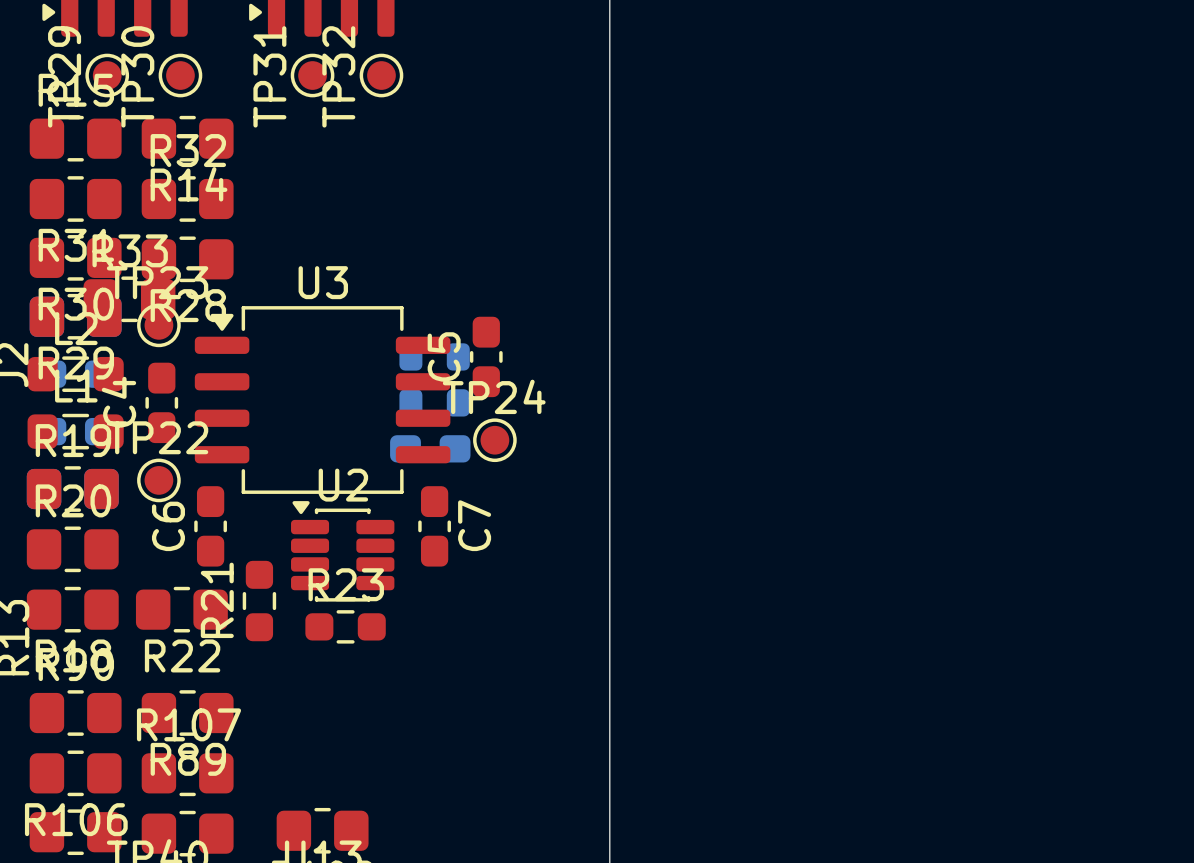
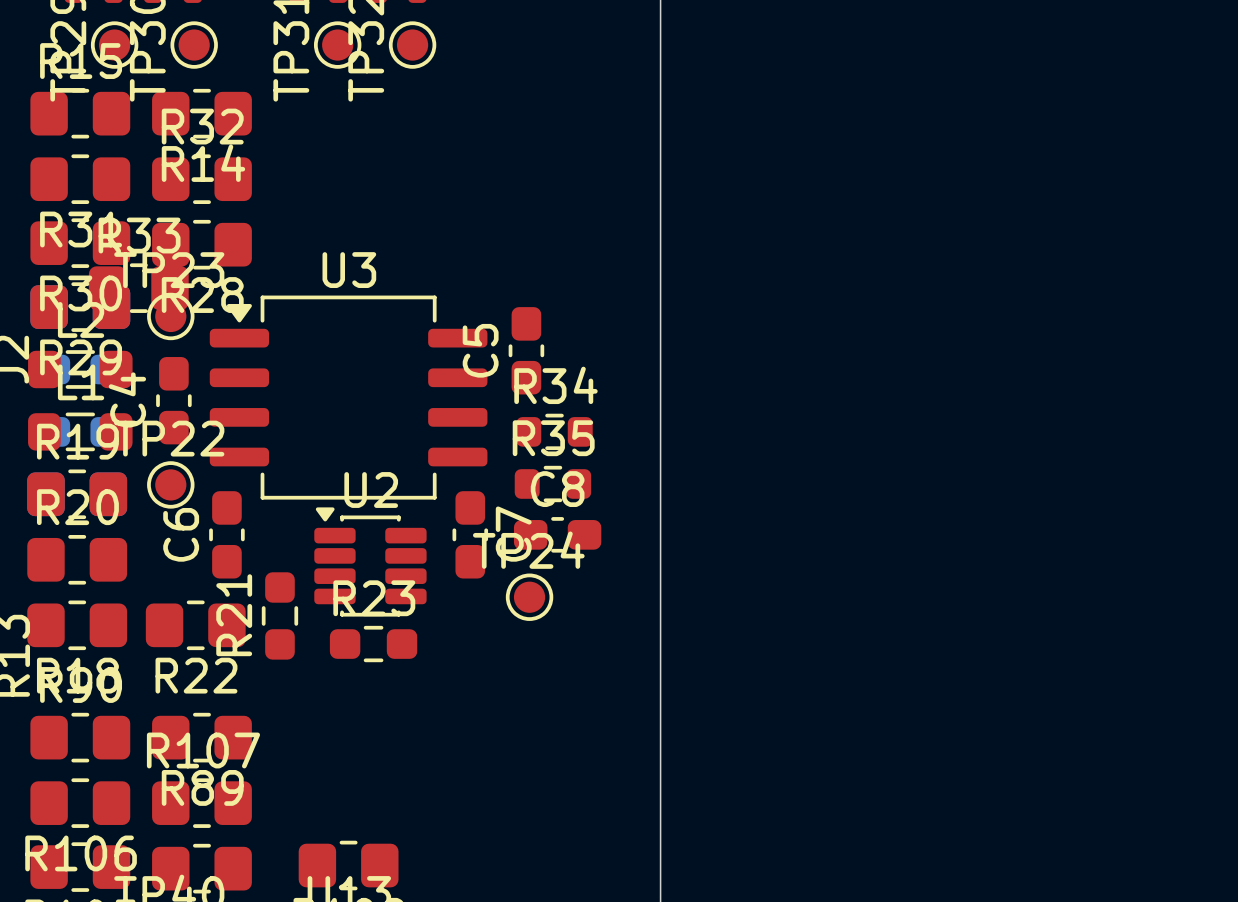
R34 side: bottom (434, 356) -> top (554, 431)
R35 side: bottom (434, 402) -> top (552, 483)
TP24 position: (494, 440) -> (529, 597)
C8 side: bottom (430, 448) -> top (557, 534)

